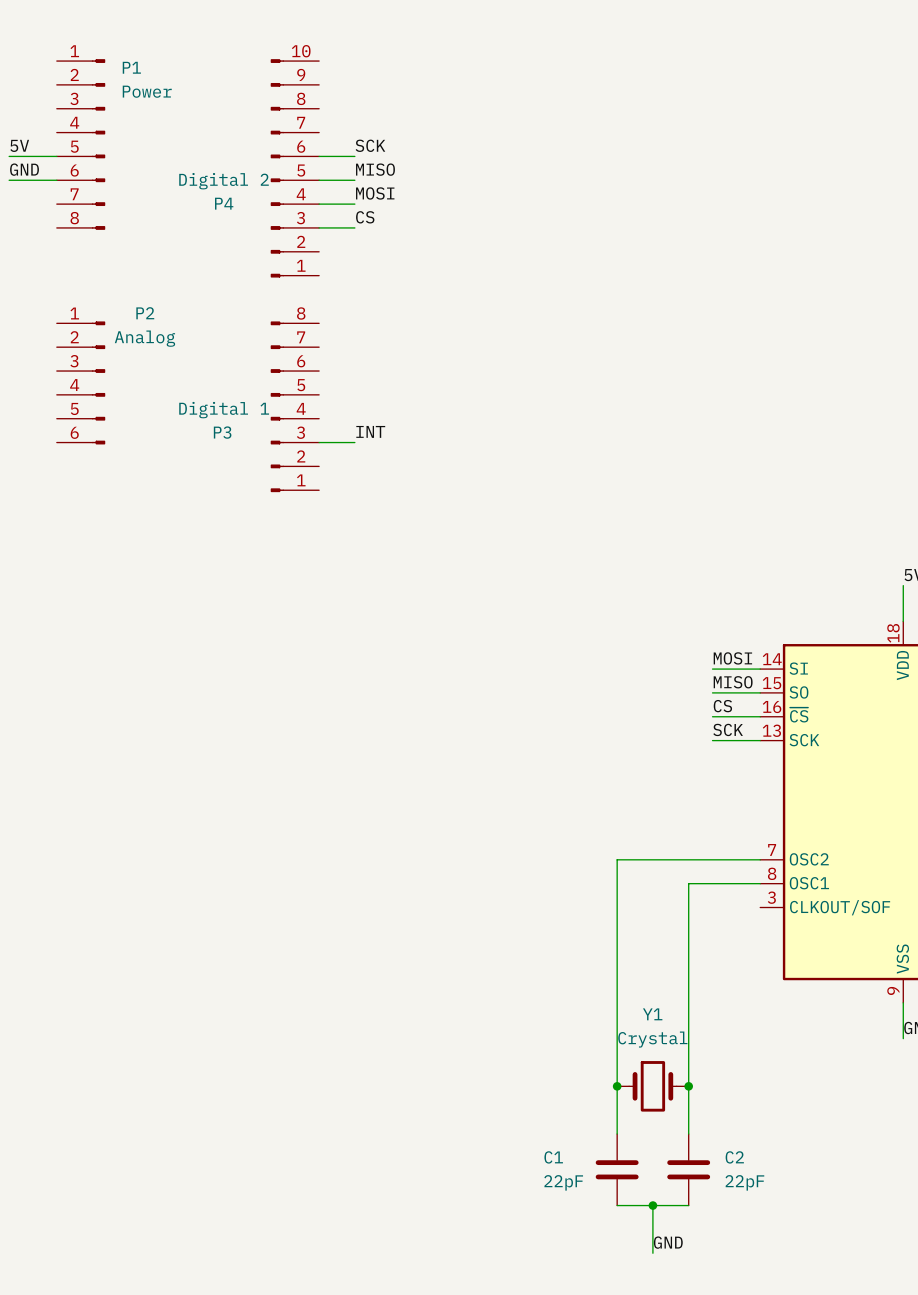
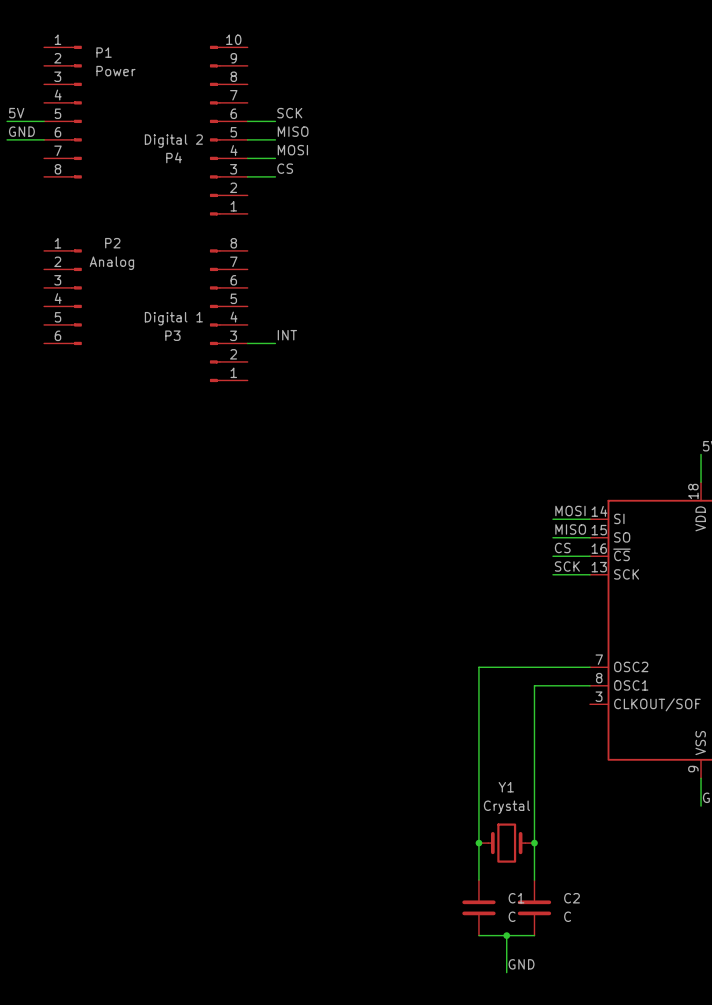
C1 name position: C1 (553, 1157) -> C1 (516, 898)
C1 value: 22pF (563, 1182) -> C (512, 916)
C2 value: 22pF (744, 1182) -> C (567, 916)

